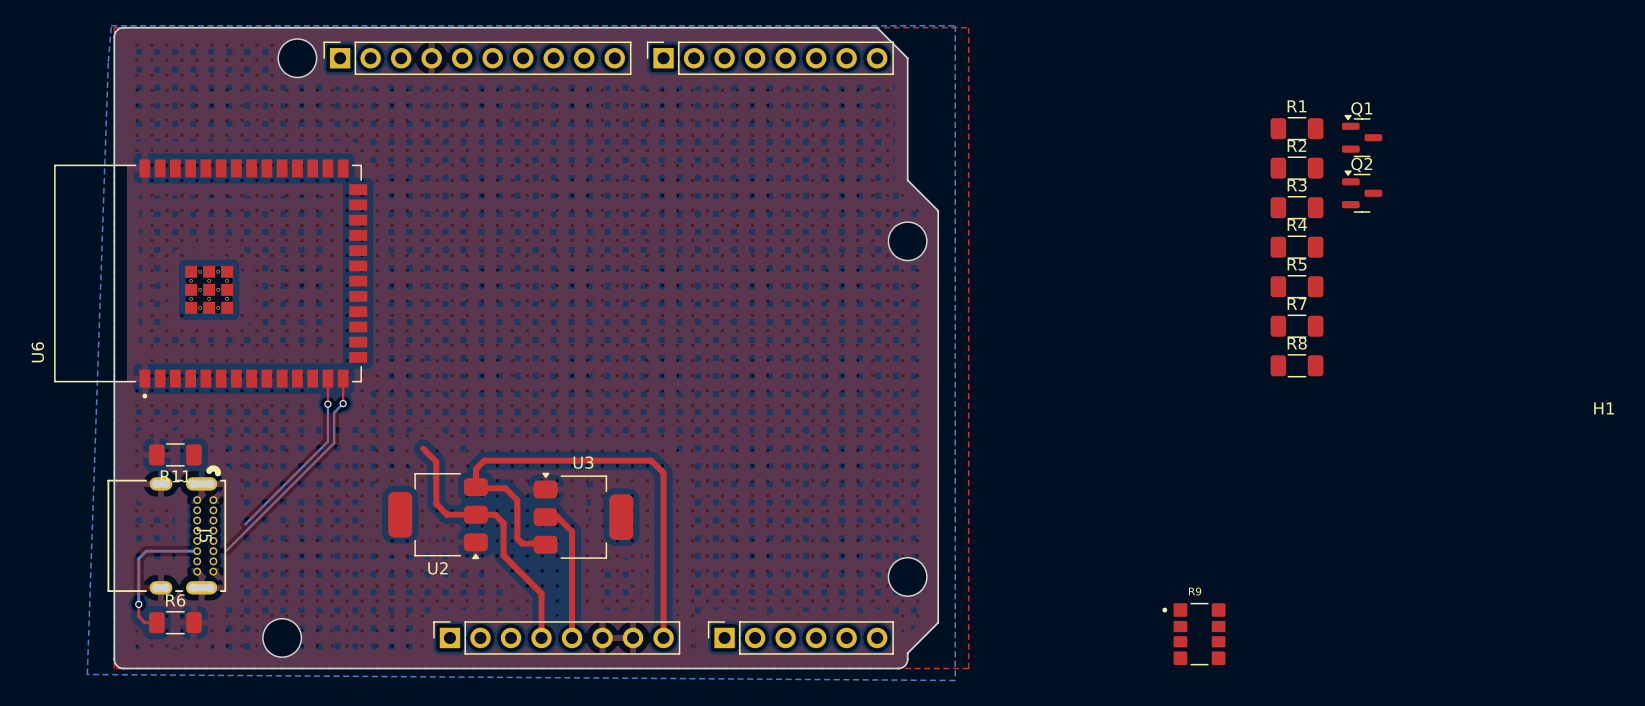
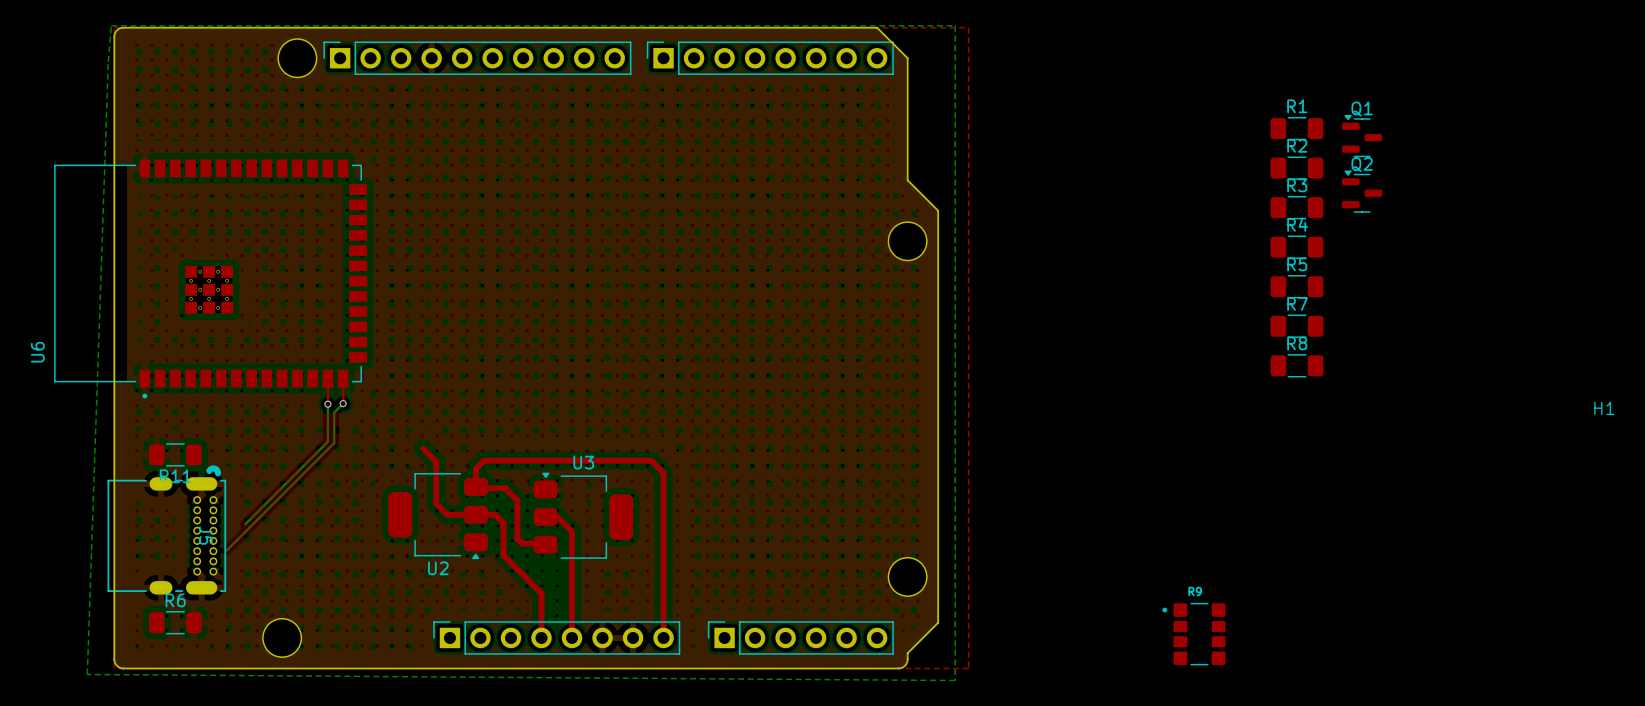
bottom track: (197, 551) (146, 551) (138, 558) (138, 604) -> none
top track: (138, 604) (138, 616) (144, 622) (156, 622) -> none
via: (138, 604) -> none

